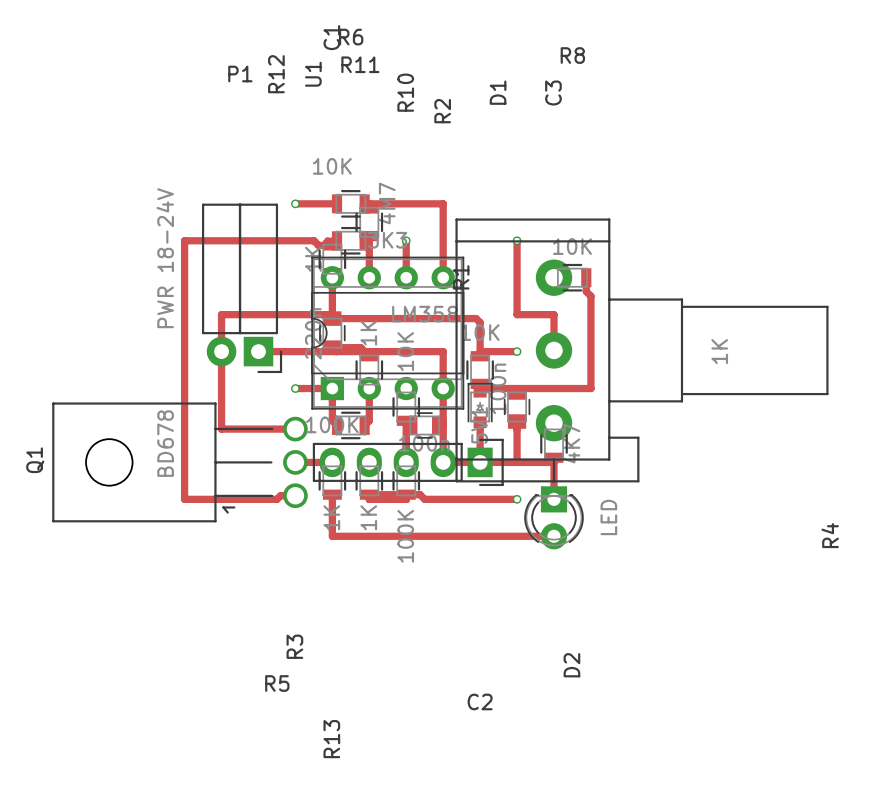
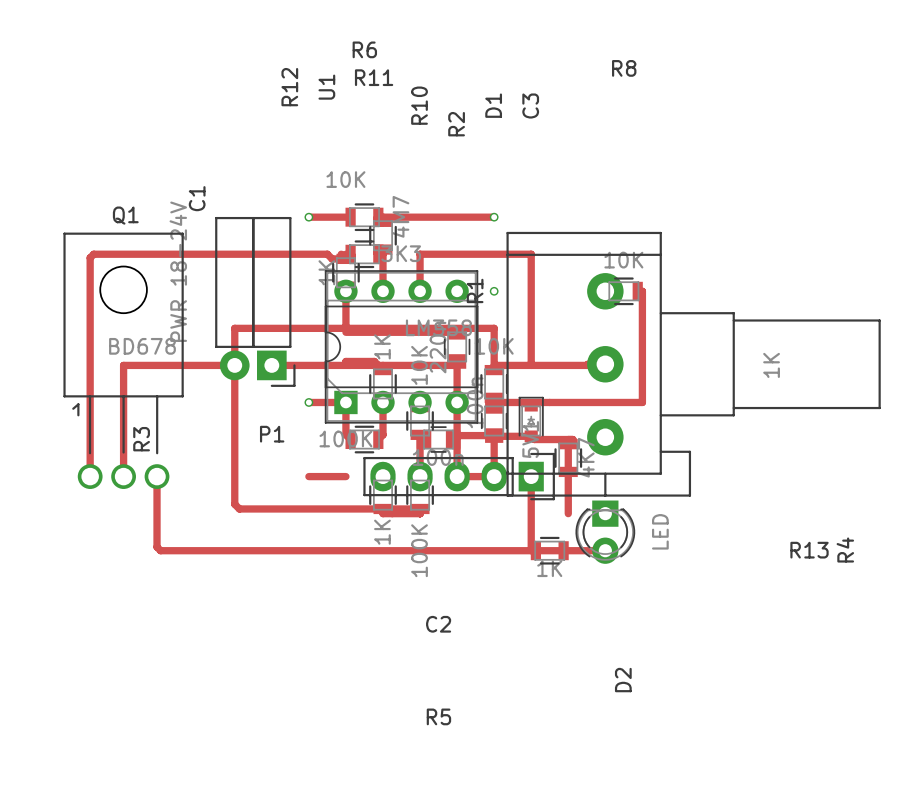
C1 name position: C1 (331, 37) -> C1 (197, 198)
P1 name position: P1 (240, 74) -> P1 (272, 434)
D1 name position: D1 (498, 92) -> D1 (493, 105)
track: (443, 203) (443, 277) -> (457, 217) (494, 217)
via: none -> (494, 217)
track: (184, 240) (184, 499) (276, 499) (280, 495) (295, 495) -> (197, 254) (93, 254) (90, 257) (90, 476)
track: none -> (420, 254) (531, 254)
via: (406, 240) -> none
via: (517, 240) -> none
via: none -> (494, 291)
R8 position: (572, 277) -> (623, 291)
track: (586, 277) (586, 291) (590, 296) (590, 388) -> (637, 291) (642, 291) (642, 402) (605, 402)
track: (517, 314) (554, 314) (554, 350) -> (531, 328) (531, 365) (605, 364)
track: (443, 318) (476, 318) (480, 322) -> (345, 328) (494, 328) (494, 336)
C1 position: (332, 333) -> (457, 346)
part position: (641, 350) -> (693, 364)
track: none -> (234, 365) (123, 365) (123, 476)
via: (517, 351) -> none
D1 position: (480, 405) -> (531, 419)
C3 position: (517, 407) -> (494, 421)
track: none -> (457, 435) (531, 436) (534, 439) (568, 439) (568, 471)
track: (517, 421) (517, 462) -> (531, 550) (531, 476)
track: (221, 429) (295, 429) -> (234, 443) (234, 504) (239, 508) (383, 508)
Q1 rotation: 0° (179, 462) -> 90° clockwise (123, 360)
part position: (408, 462) -> (459, 476)
track: (480, 462) (554, 462) -> none
R13 rotation: 0° (332, 480) -> 90° clockwise (549, 550)
R13 position: (332, 480) -> (549, 550)
track: (332, 494) (332, 536) -> (157, 476) (157, 547) (160, 550) (345, 550)
track: (406, 494) (420, 494) (424, 499) (517, 499) -> none
via: (517, 499) -> none
D2 position: (554, 517) -> (605, 532)
track: none -> (568, 550) (605, 550)
R3 name position: R3 (294, 646) -> R3 (141, 439)
R5 name position: R5 (277, 683) -> R5 (438, 716)
C2 name position: C2 (480, 701) -> C2 (438, 624)
R13 name position: R13 (331, 739) -> R13 (809, 550)

